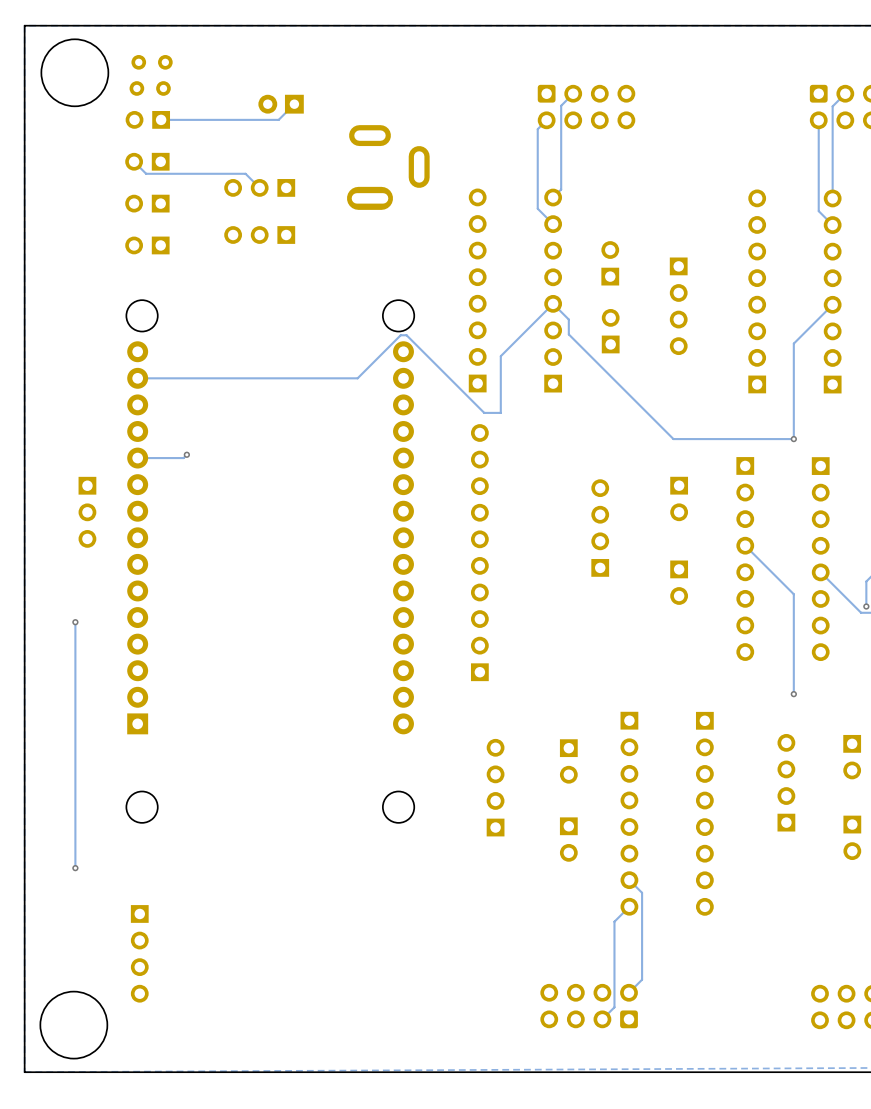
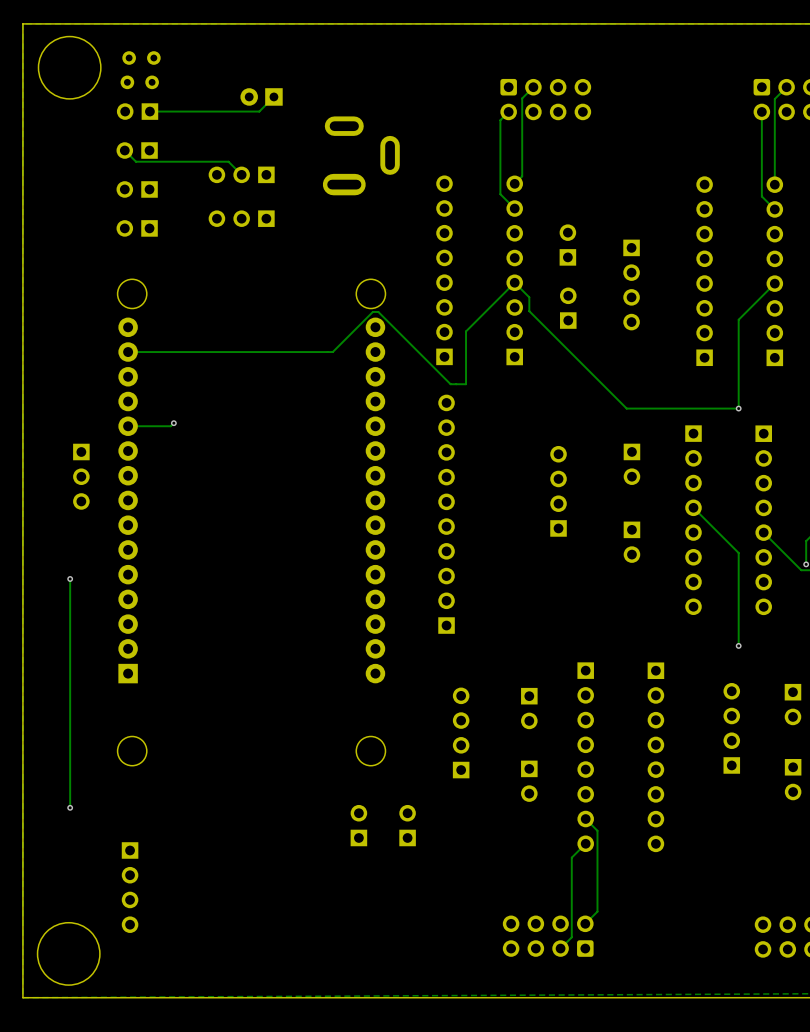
part: none -> (358, 825)
part: none -> (407, 825)

